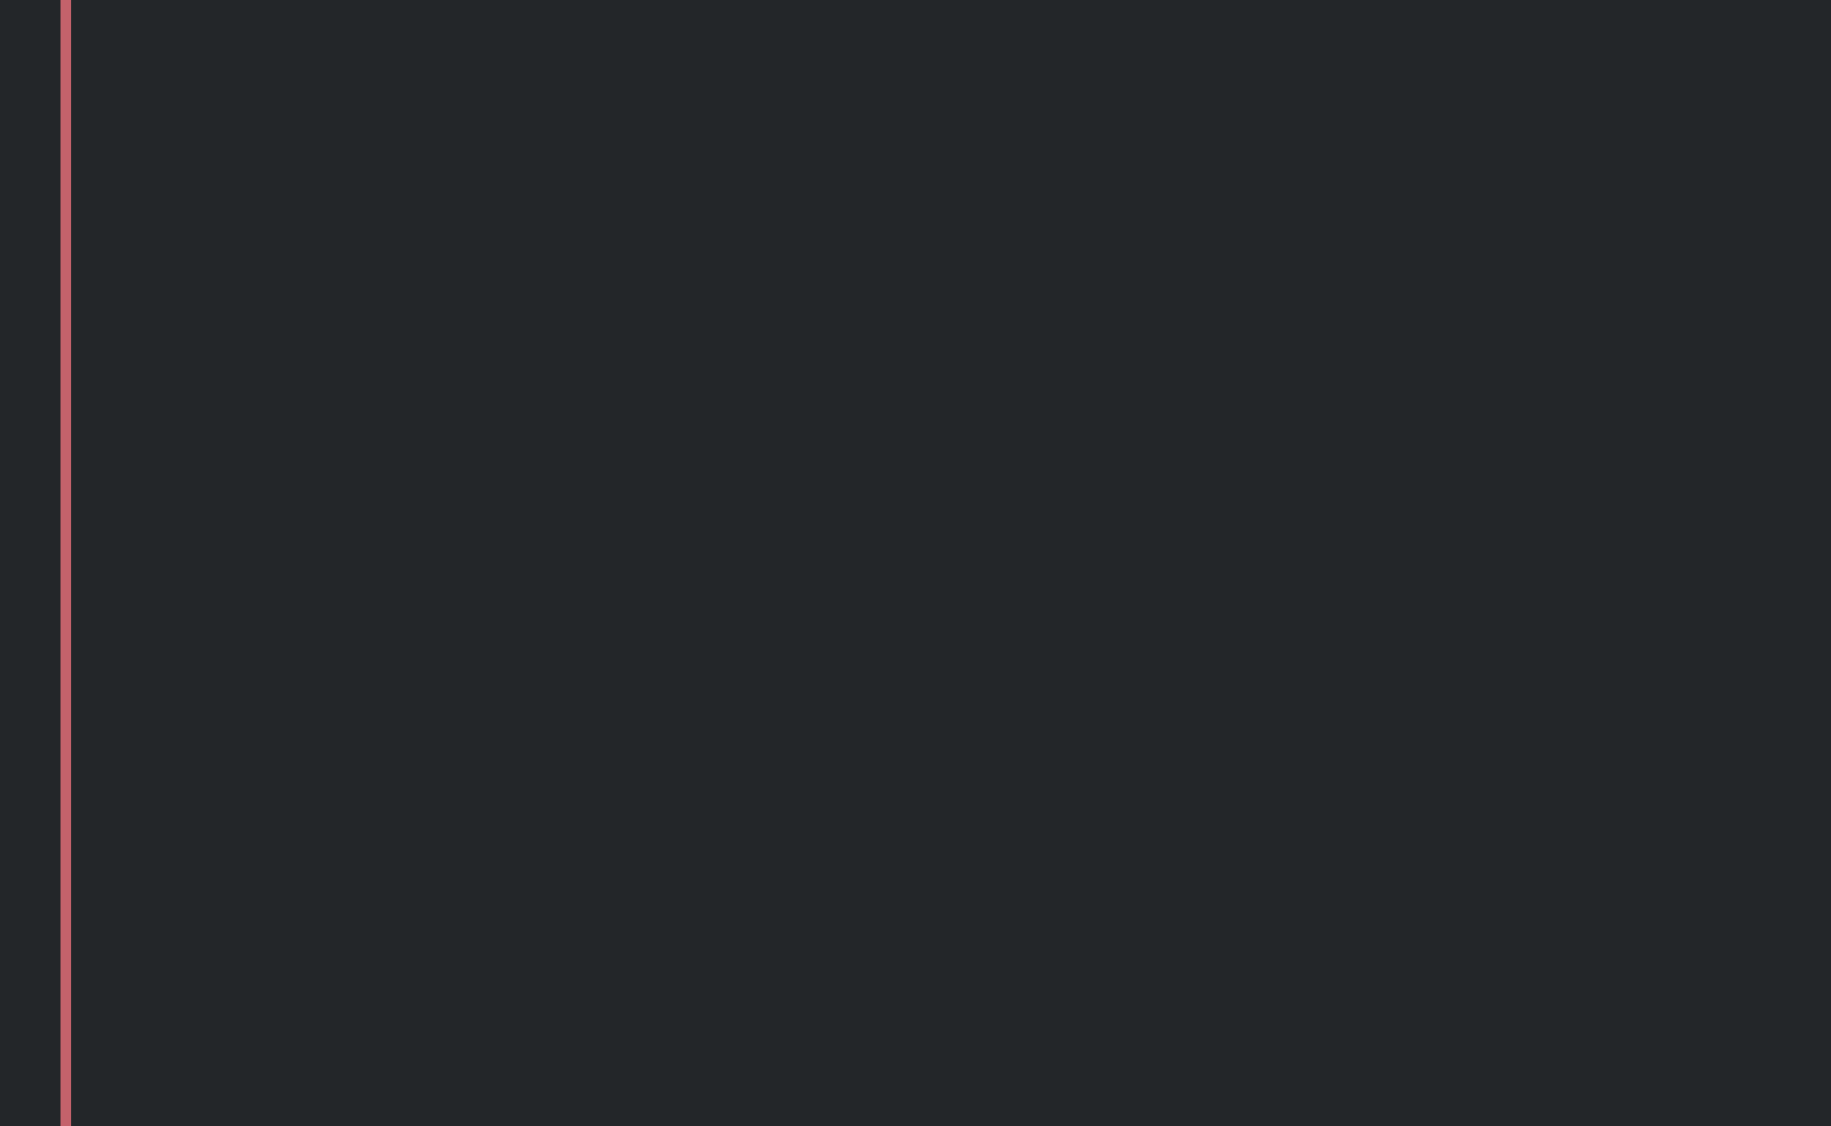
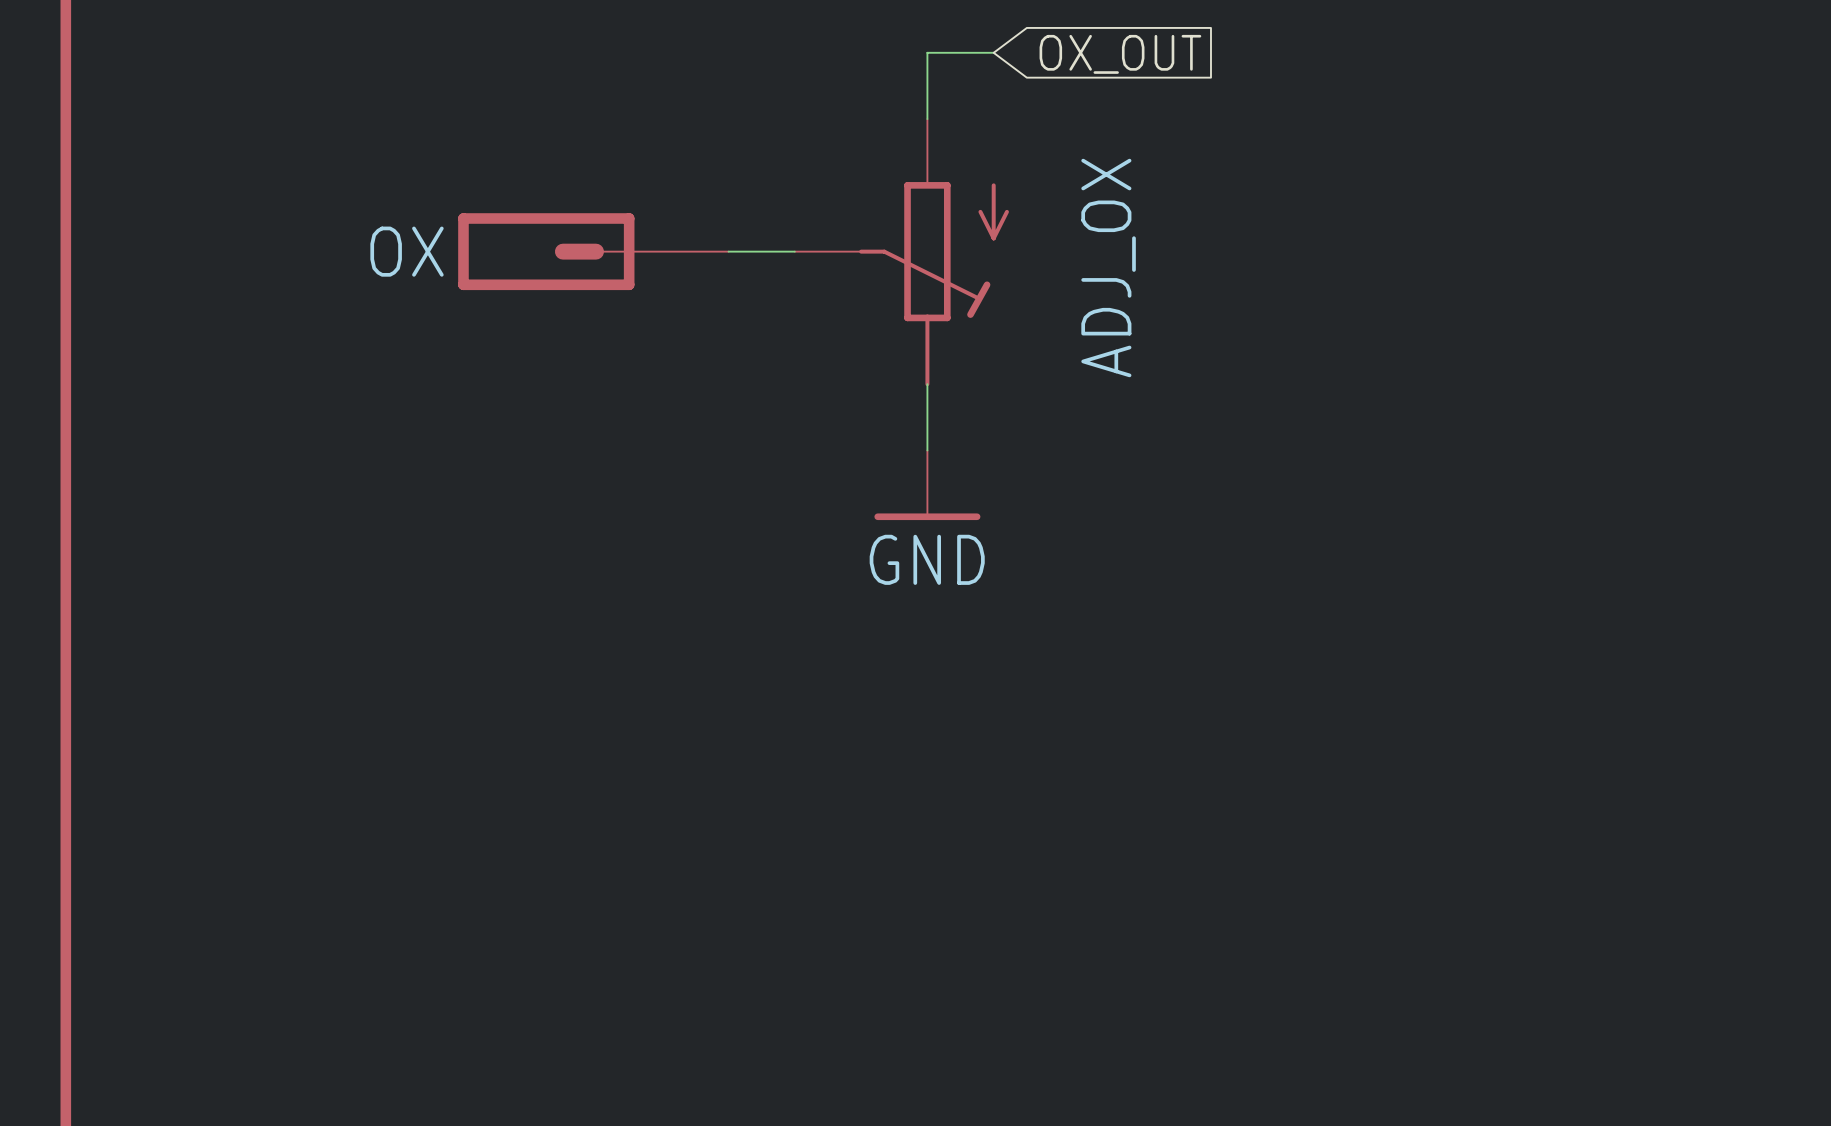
wire: none -> (993, 52) (927, 52) (927, 119)
global label: none -> OX_OUT (1120, 54)
OX: none -> (593, 251)
wire: none -> (728, 251) (794, 251)
ADJ_OX: none -> (901, 252)
wire: none -> (927, 384) (927, 450)
power symbol: none -> GND (927, 485)

